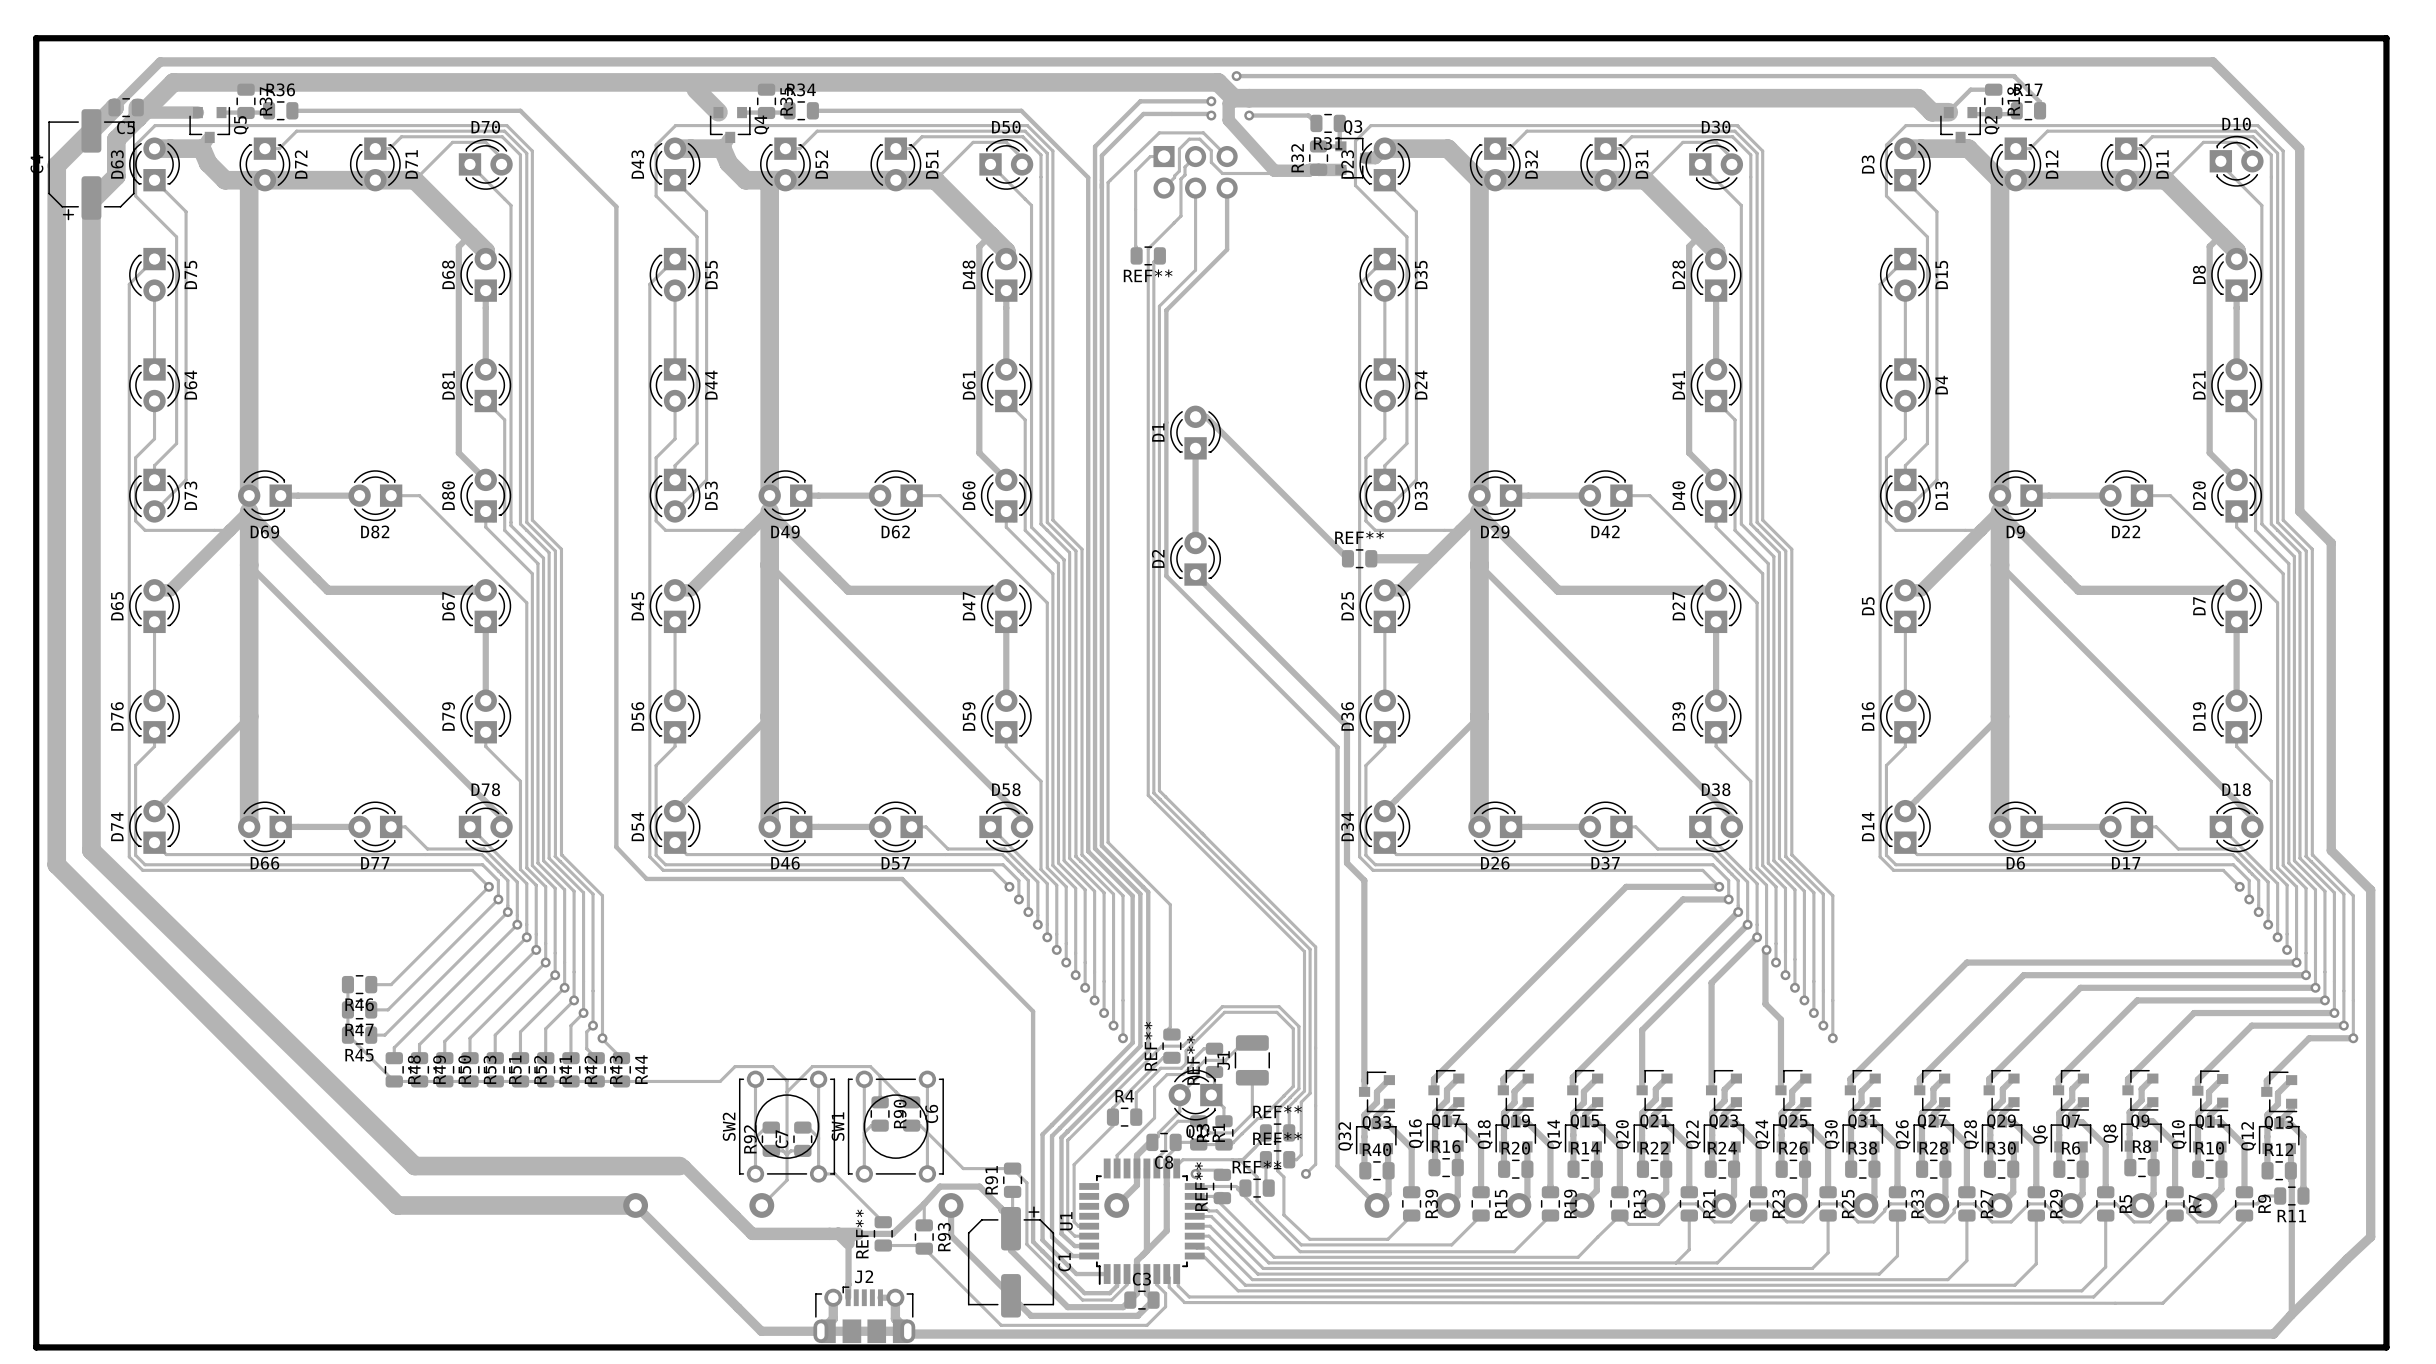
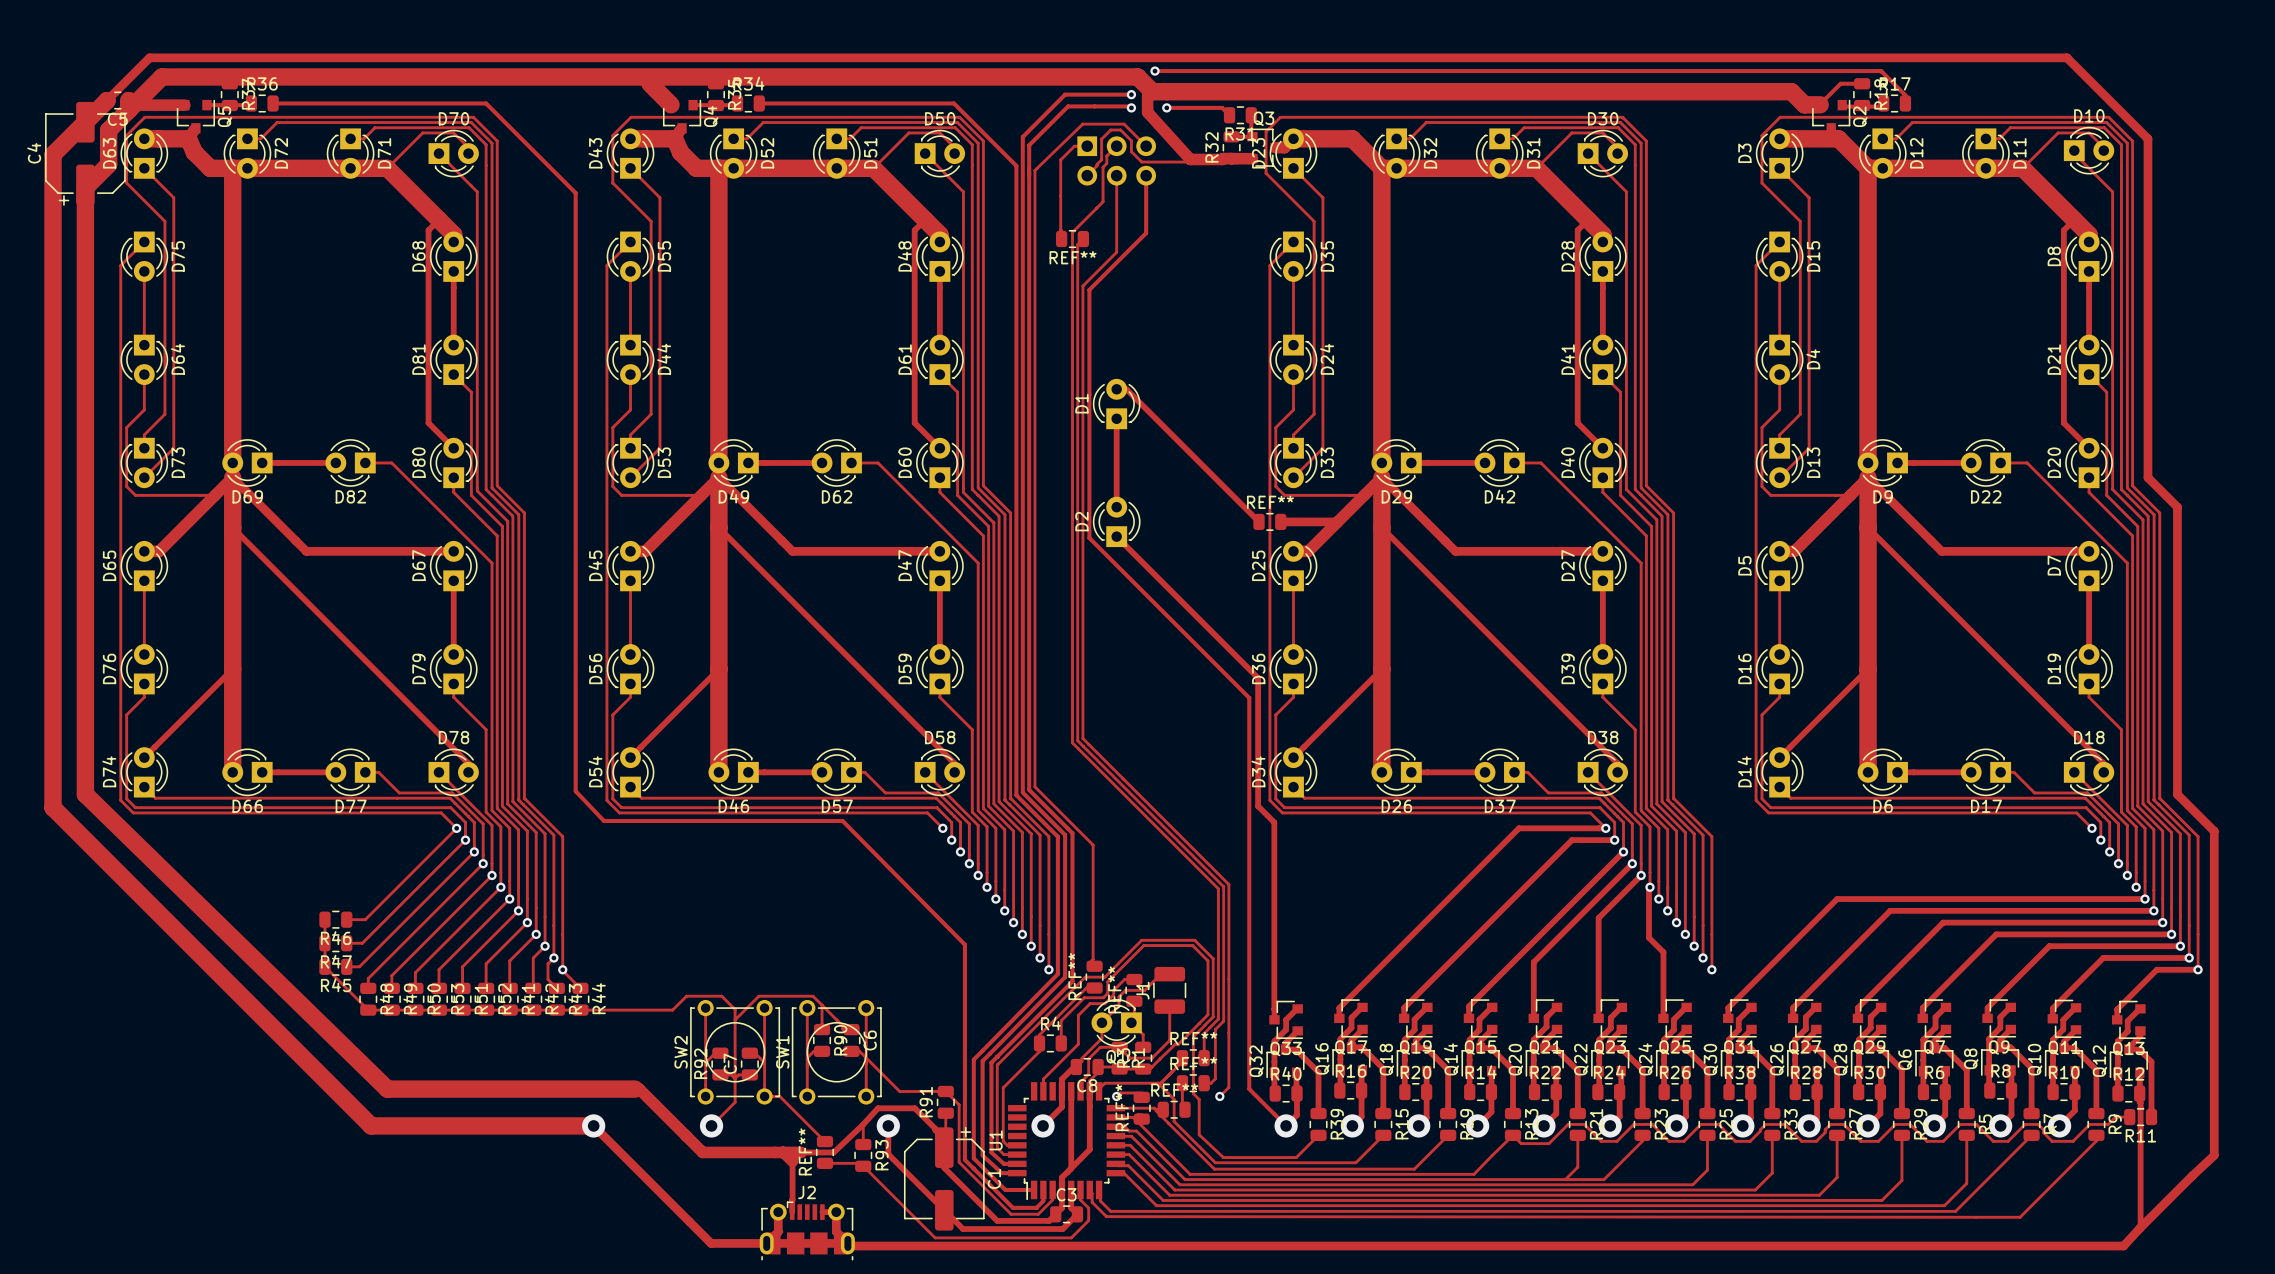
board edge: (36, 38) (2386, 38) (2386, 1347) (36, 1347) (36, 38) -> none

